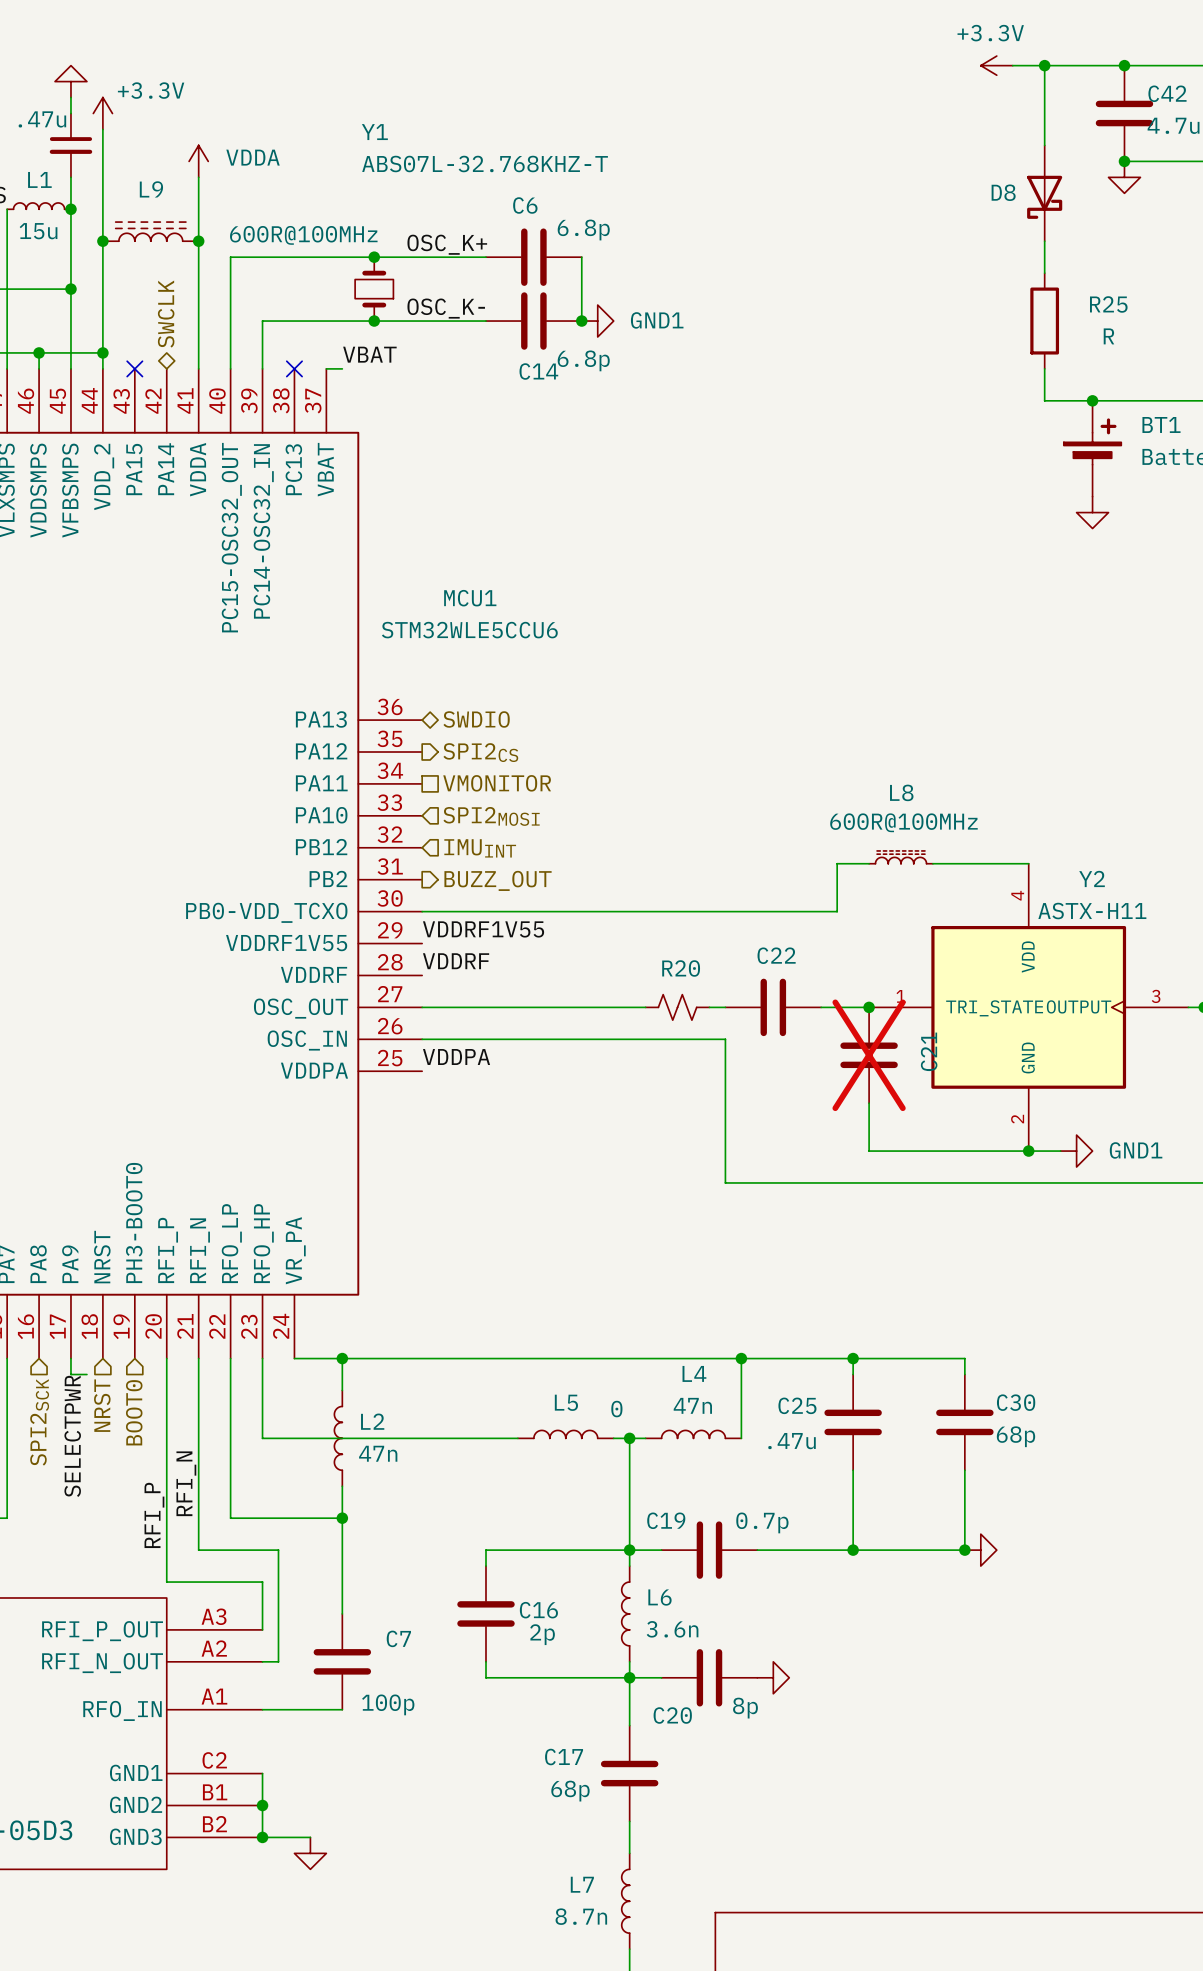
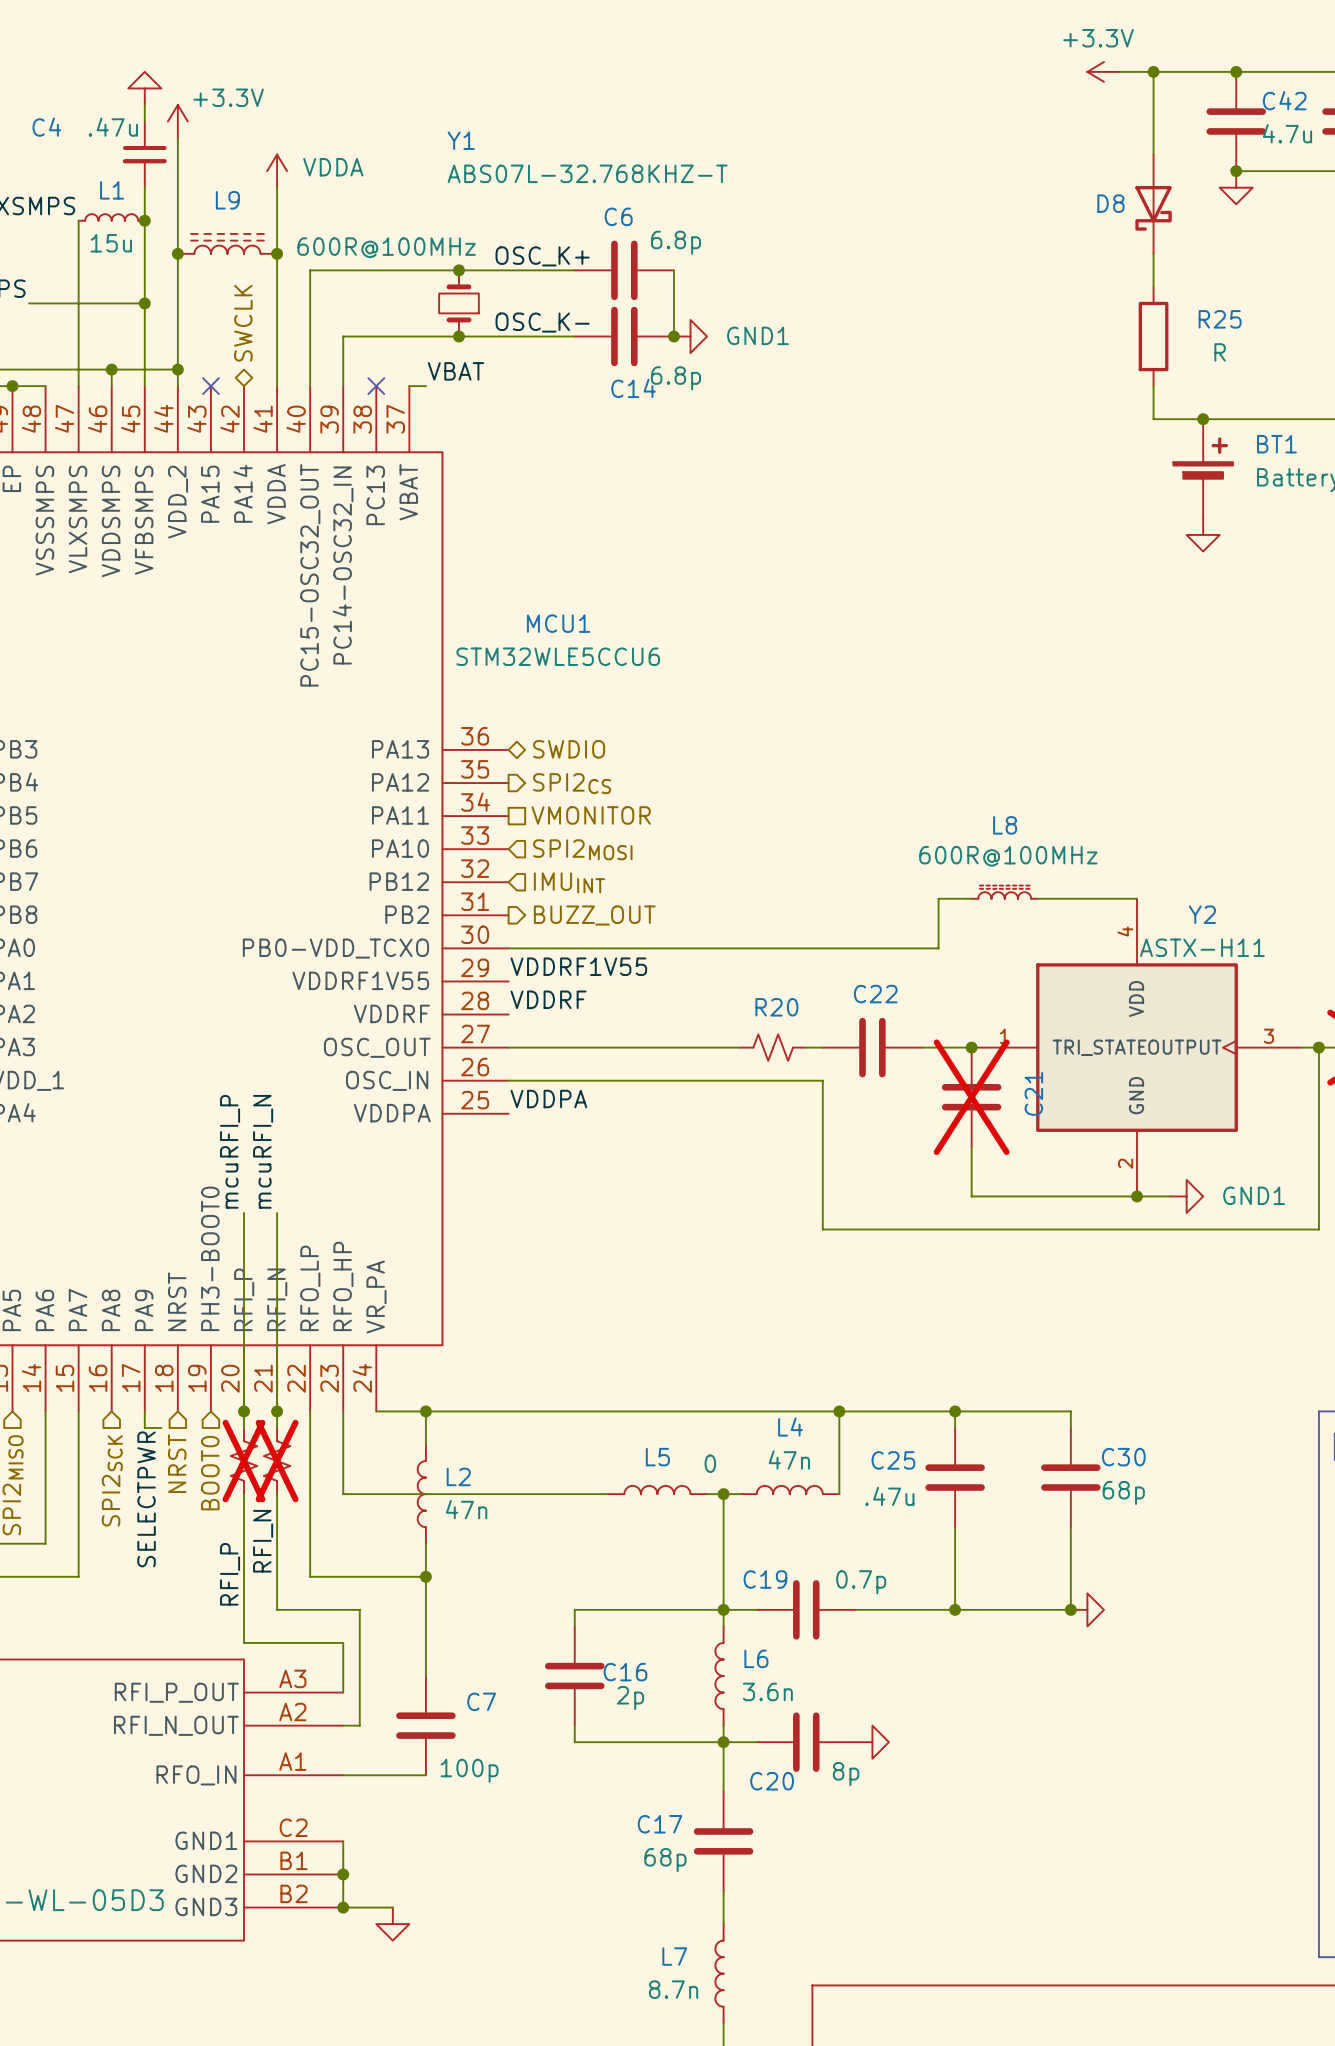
label: none -> mcuRFI_P (230, 1151)
label: none -> mcuRFI_N (263, 1151)
wire: none -> (244, 1212) (244, 1411)
wire: none -> (277, 1212) (277, 1411)
junction: none -> (244, 1411)
junction: none -> (277, 1411)
part: none -> (244, 1461)
part: none -> (277, 1461)

